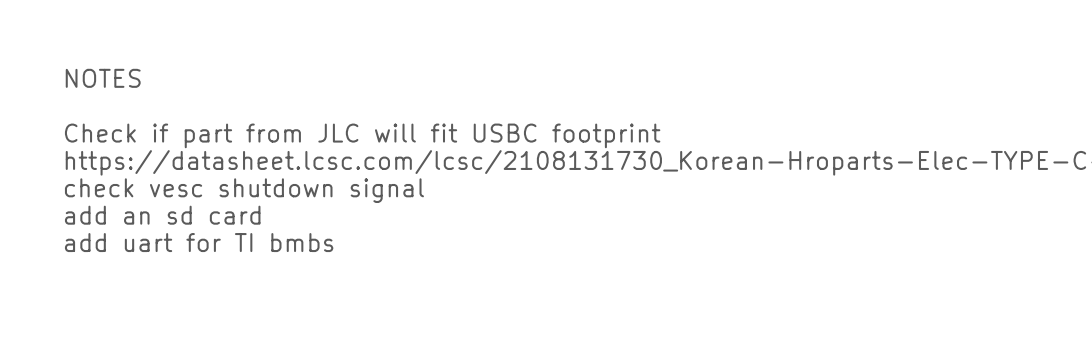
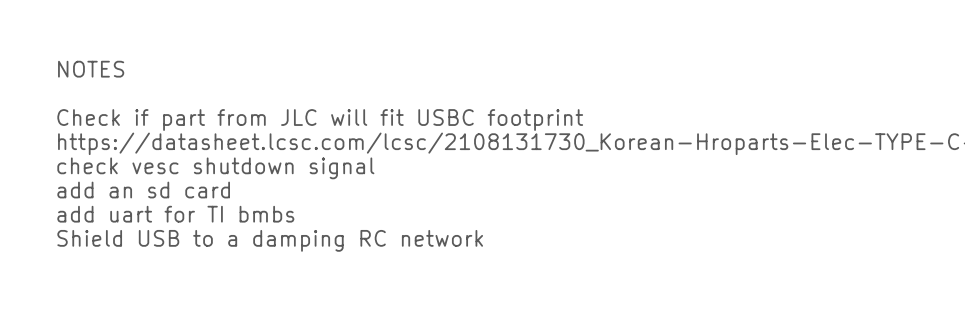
text: none -> Shield USB to a damping RC network (270, 240)

